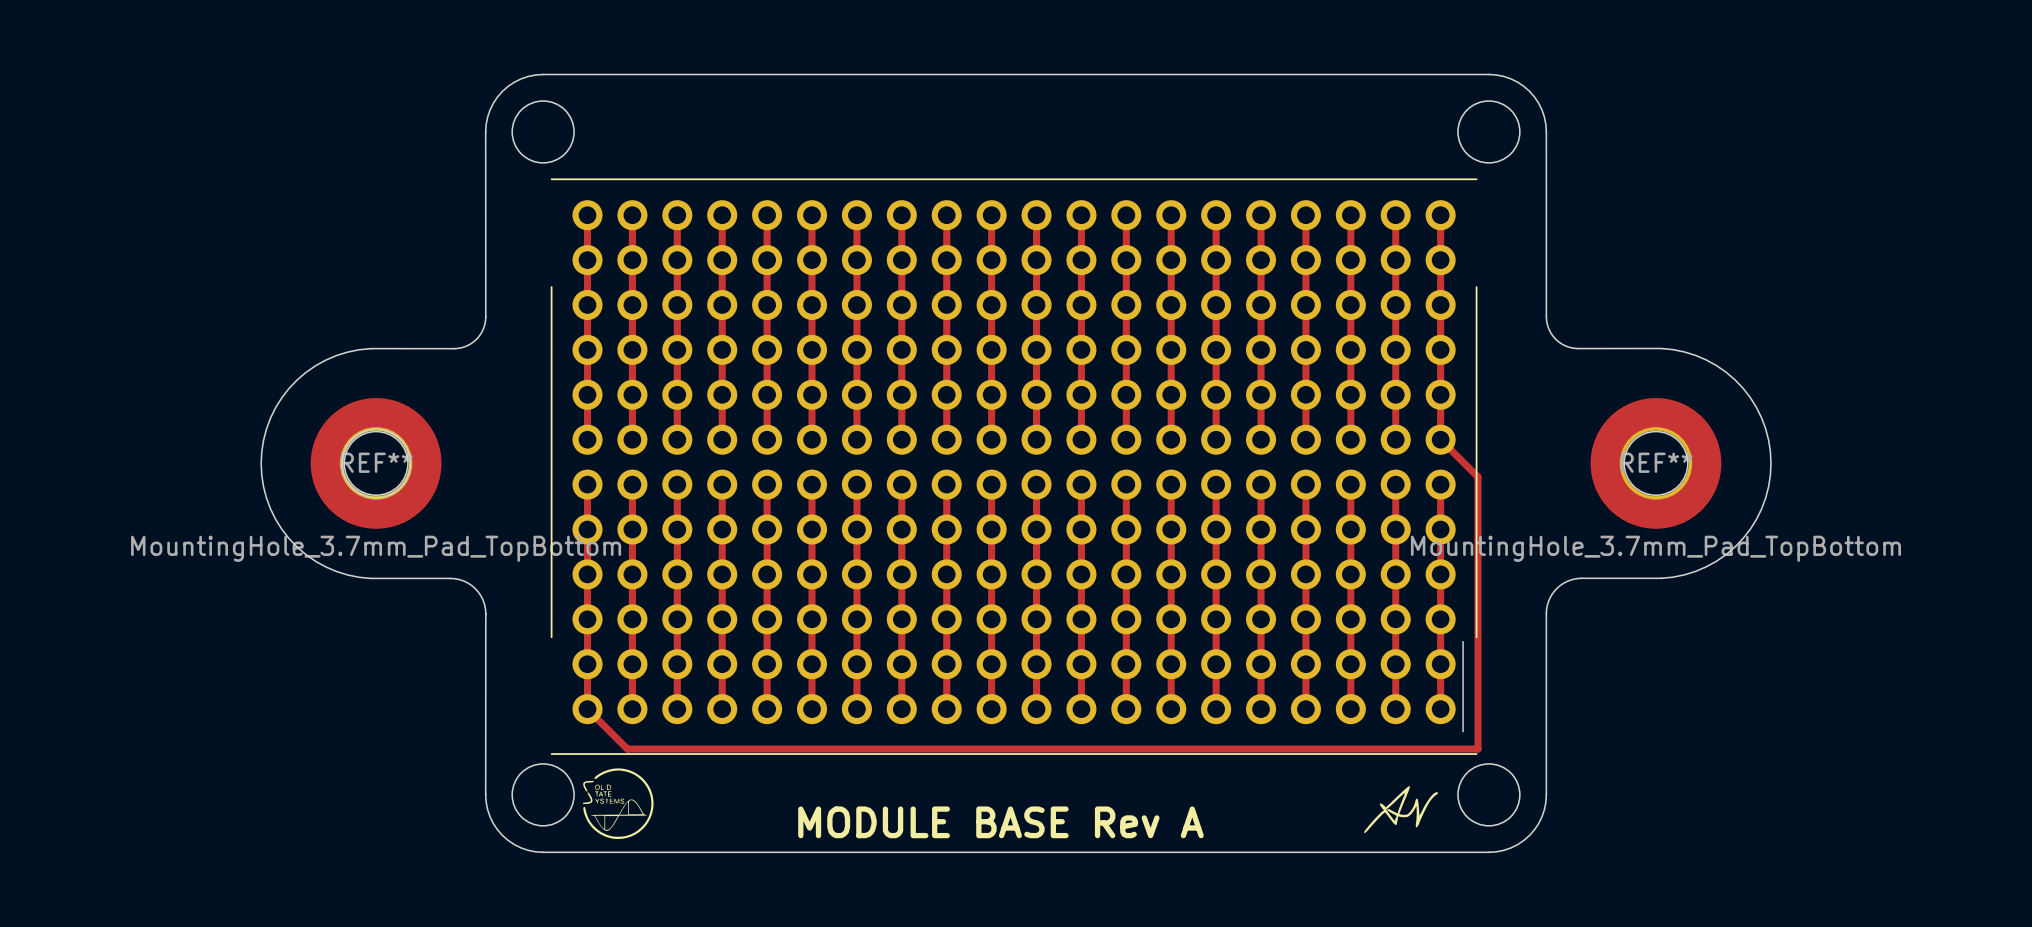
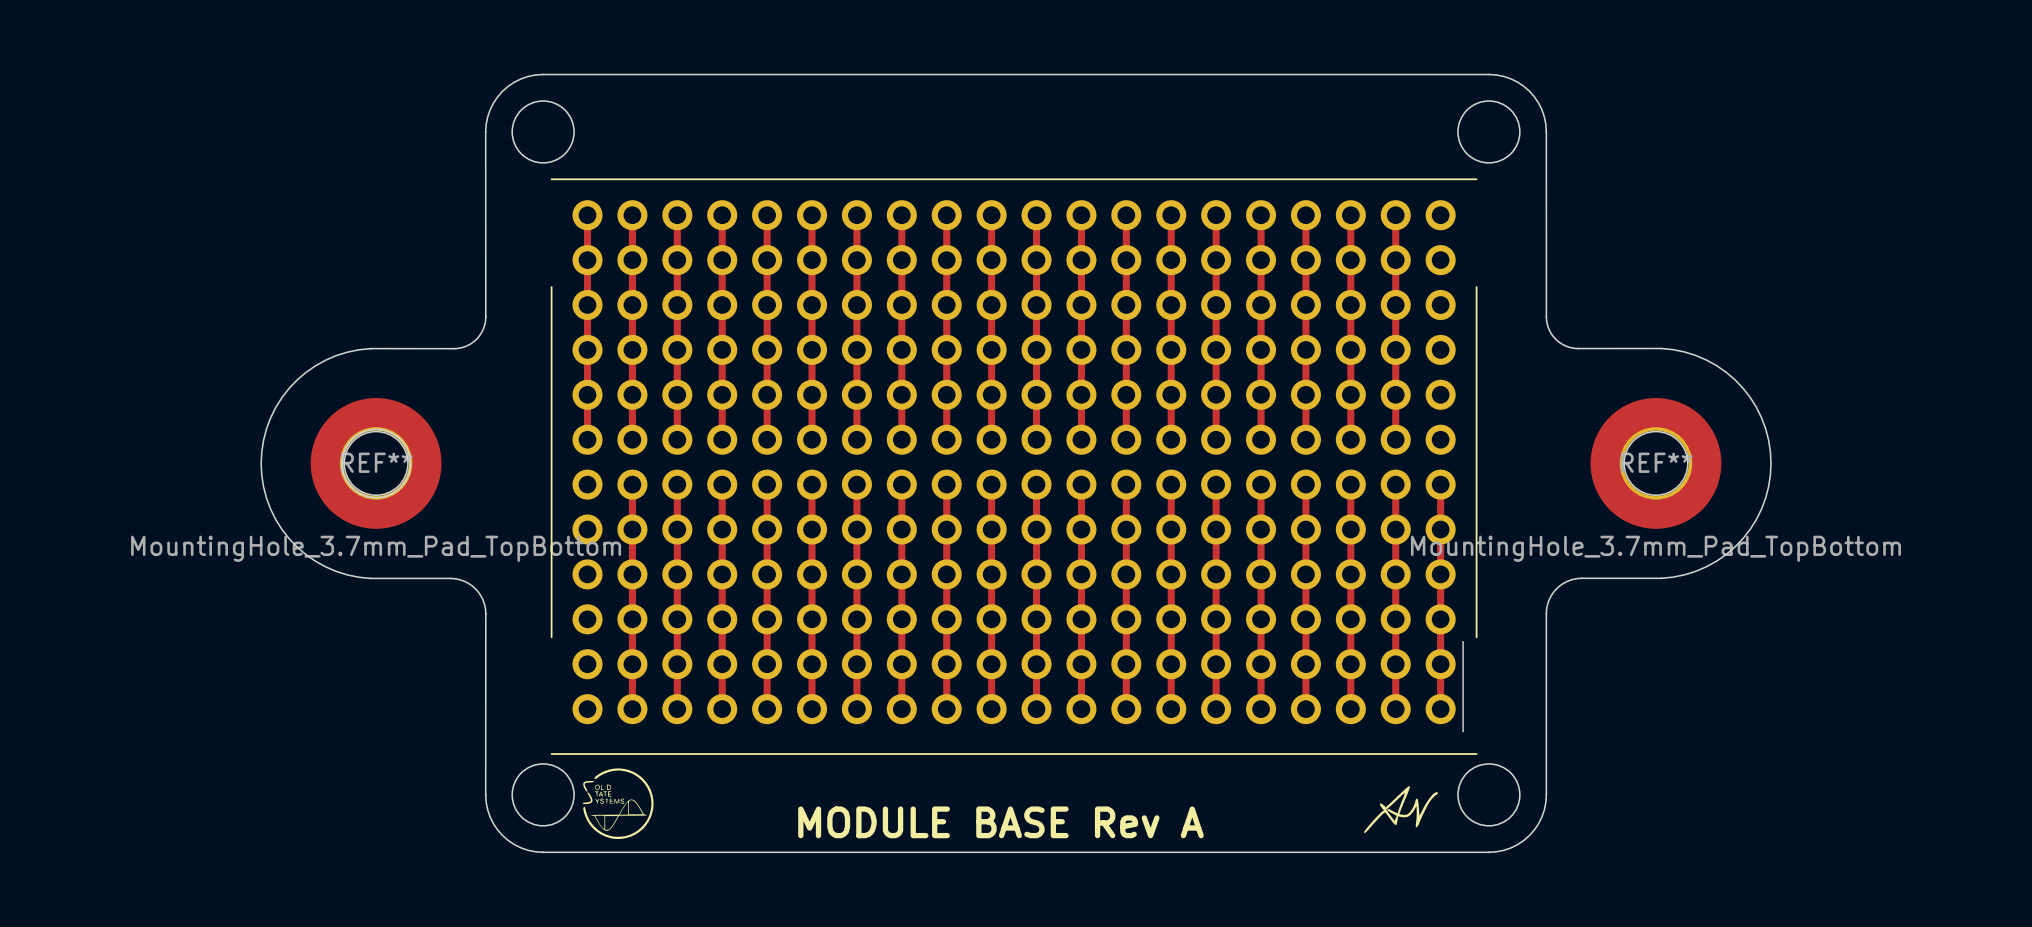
track: (1440, 215) (1440, 439) (1478, 477) (1478, 749) (627, 749) (587, 709) (587, 484) -> none

